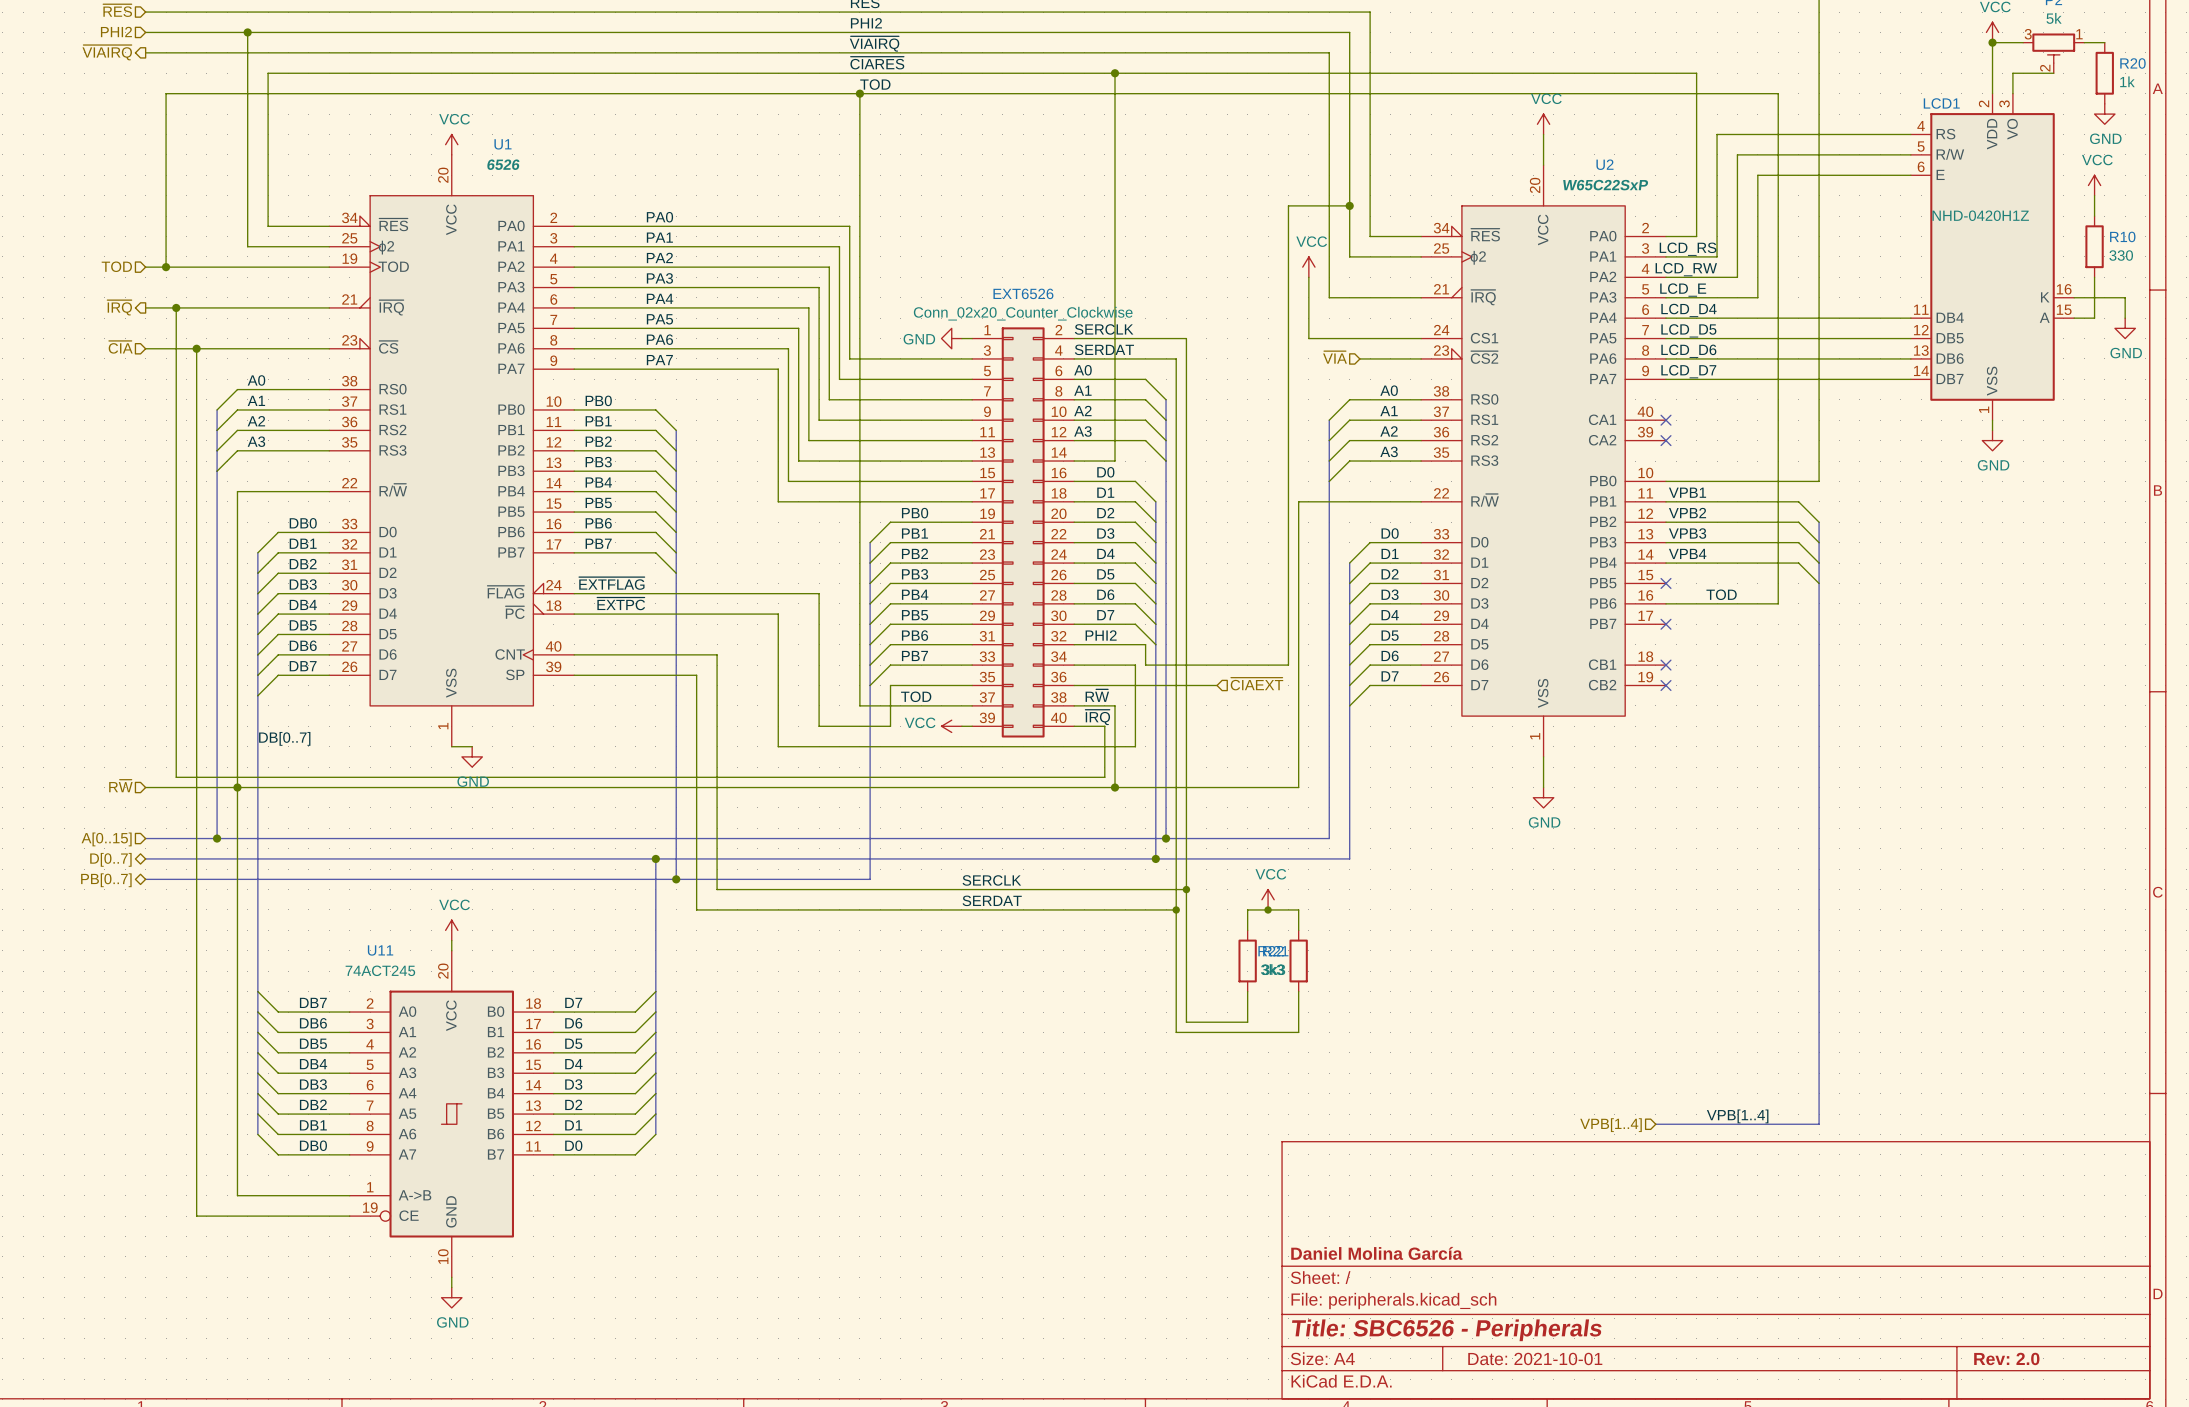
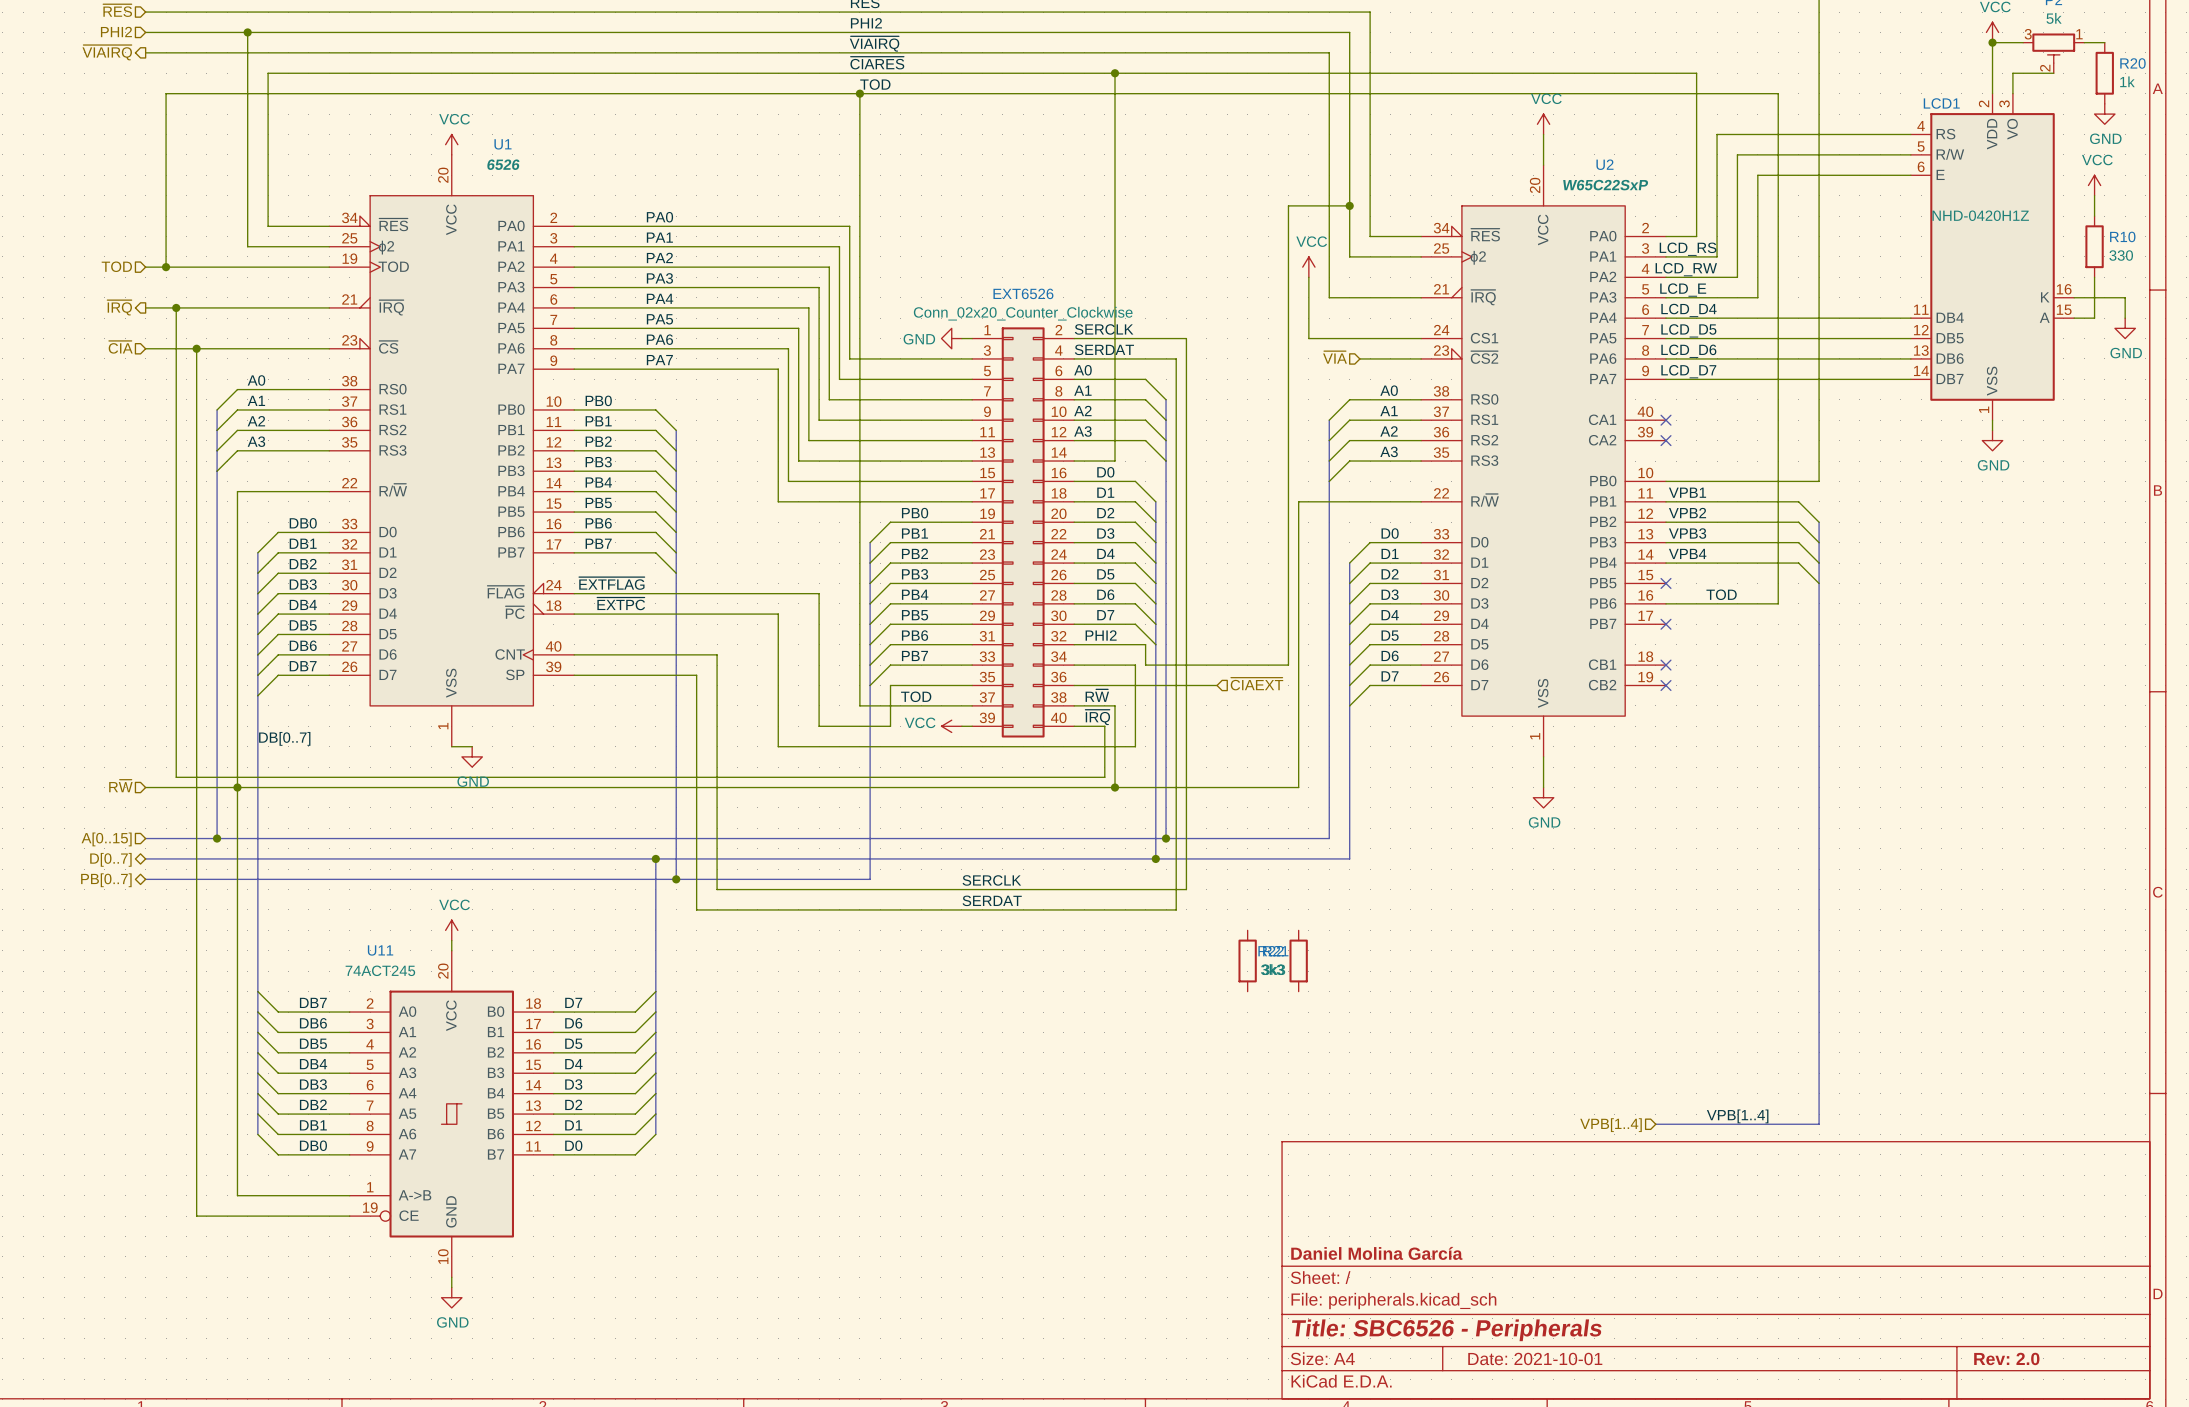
wire: (1186, 889) (1186, 1022) (1247, 1022) (1247, 991) -> none
junction: (1186, 889) -> none
power symbol: VCC (1268, 899) -> none
wire: (1176, 909) (1176, 1032) (1298, 1032) (1298, 991) -> none
junction: (1176, 909) -> none
junction: (1268, 909) -> none
wire: (1247, 930) (1247, 909) (1298, 909) (1298, 930) -> none

